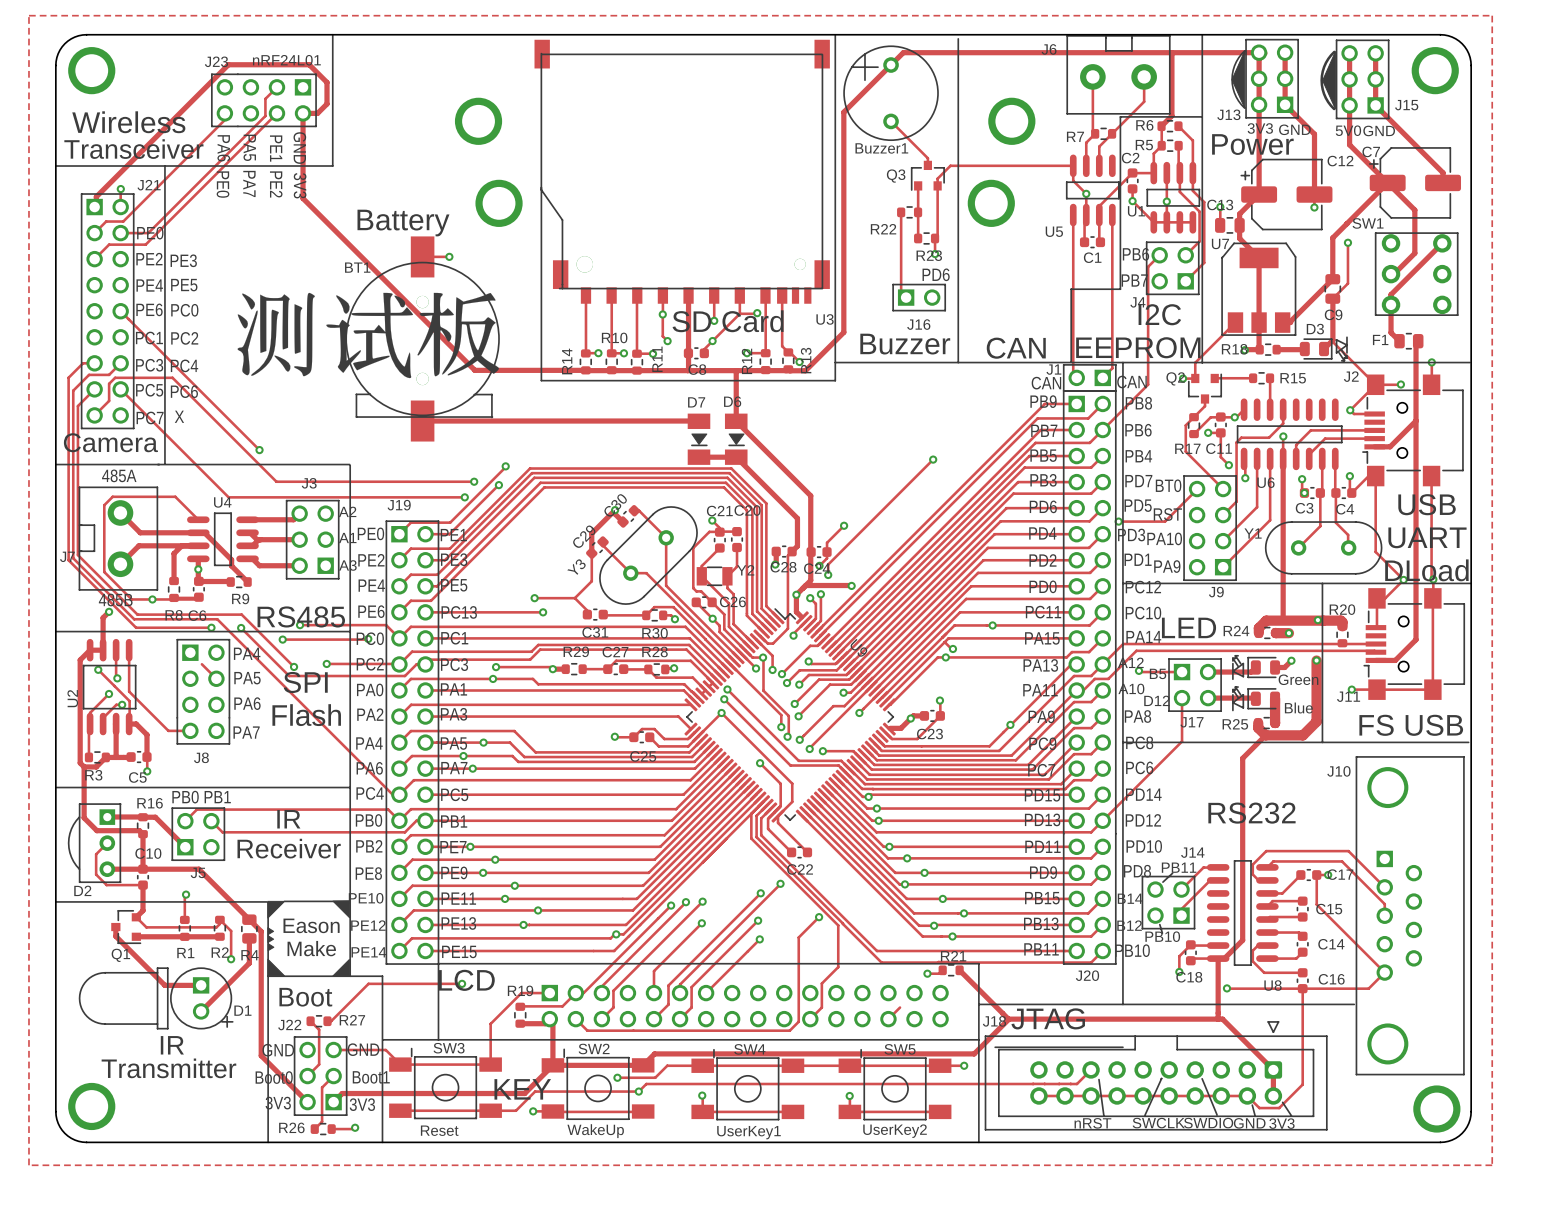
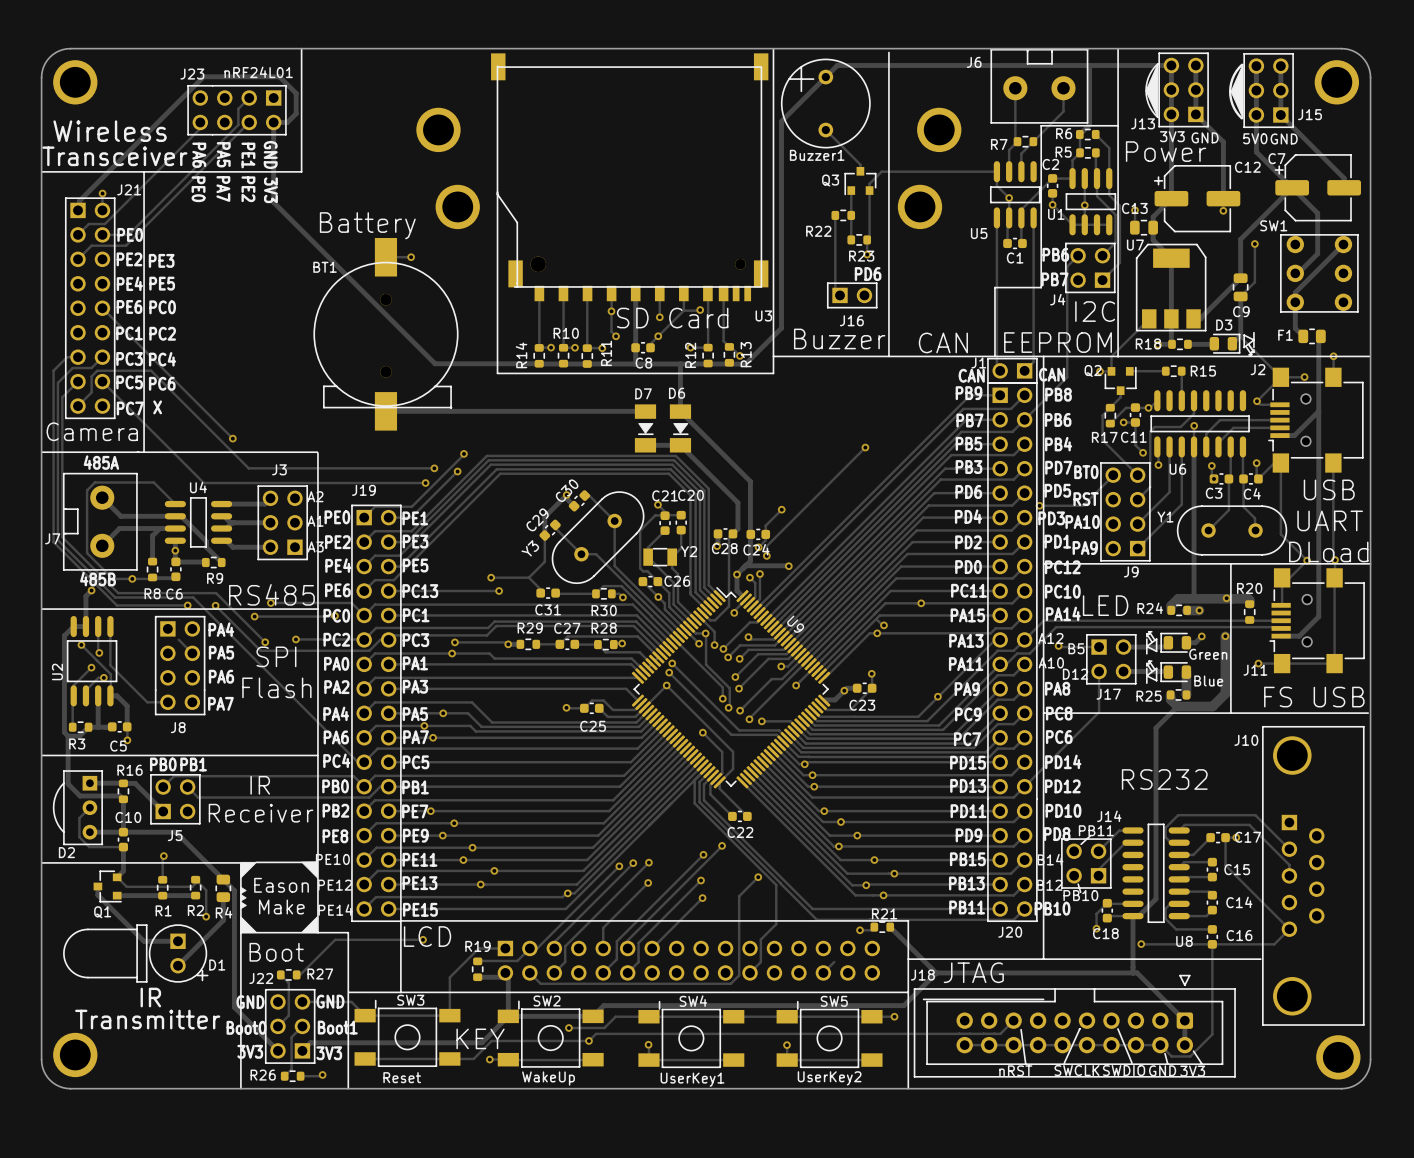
zone outline: (28, 15) (28, 1165) (1492, 1165) (1492, 15) (28, 15) -> none
drawing: [237, 292, 500, 379] -> none

